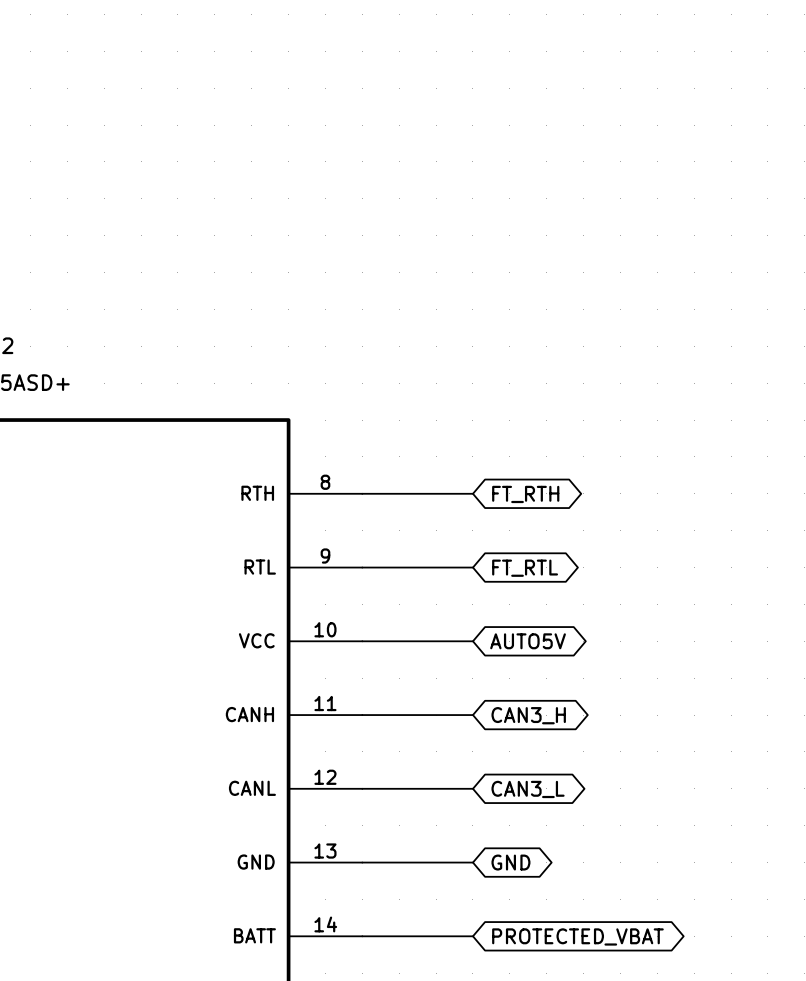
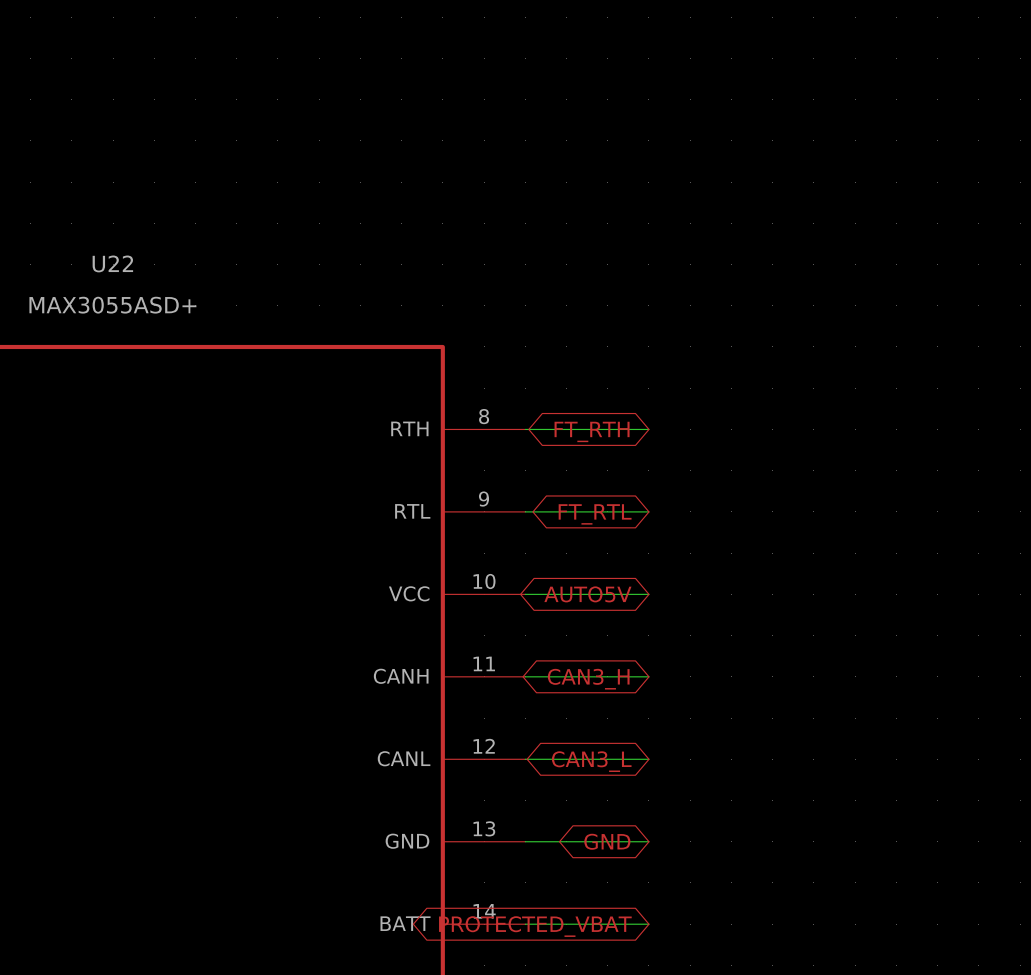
global label rotation: 0° (525, 494) -> 180° (592, 431)
global label rotation: 0° (525, 568) -> 180° (595, 514)
global label rotation: 0° (528, 641) -> 180° (587, 594)
global label rotation: 0° (528, 715) -> 180° (588, 679)
global label rotation: 0° (528, 789) -> 180° (591, 761)
global label rotation: 0° (510, 862) -> 180° (607, 841)
global label position: GND (510, 862) -> GND (607, 841)
global label rotation: 0° (577, 936) -> 180° (535, 926)

